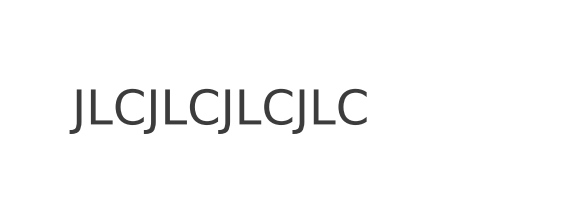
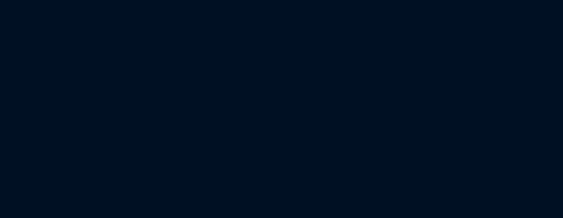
text: JLCJLCJLCJLC (218, 111) -> none

